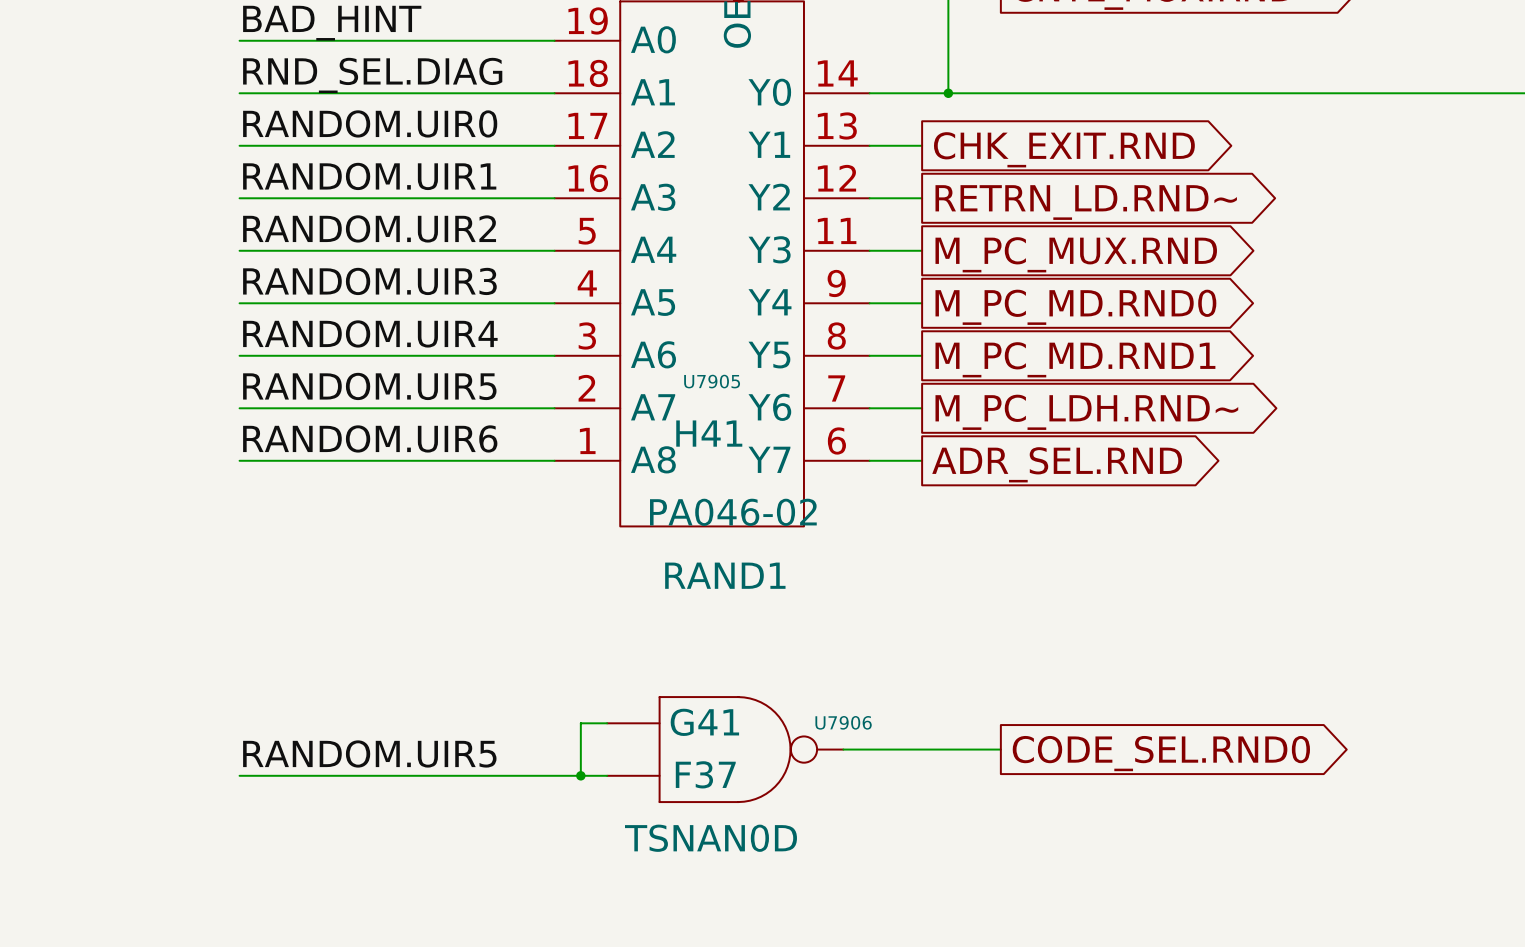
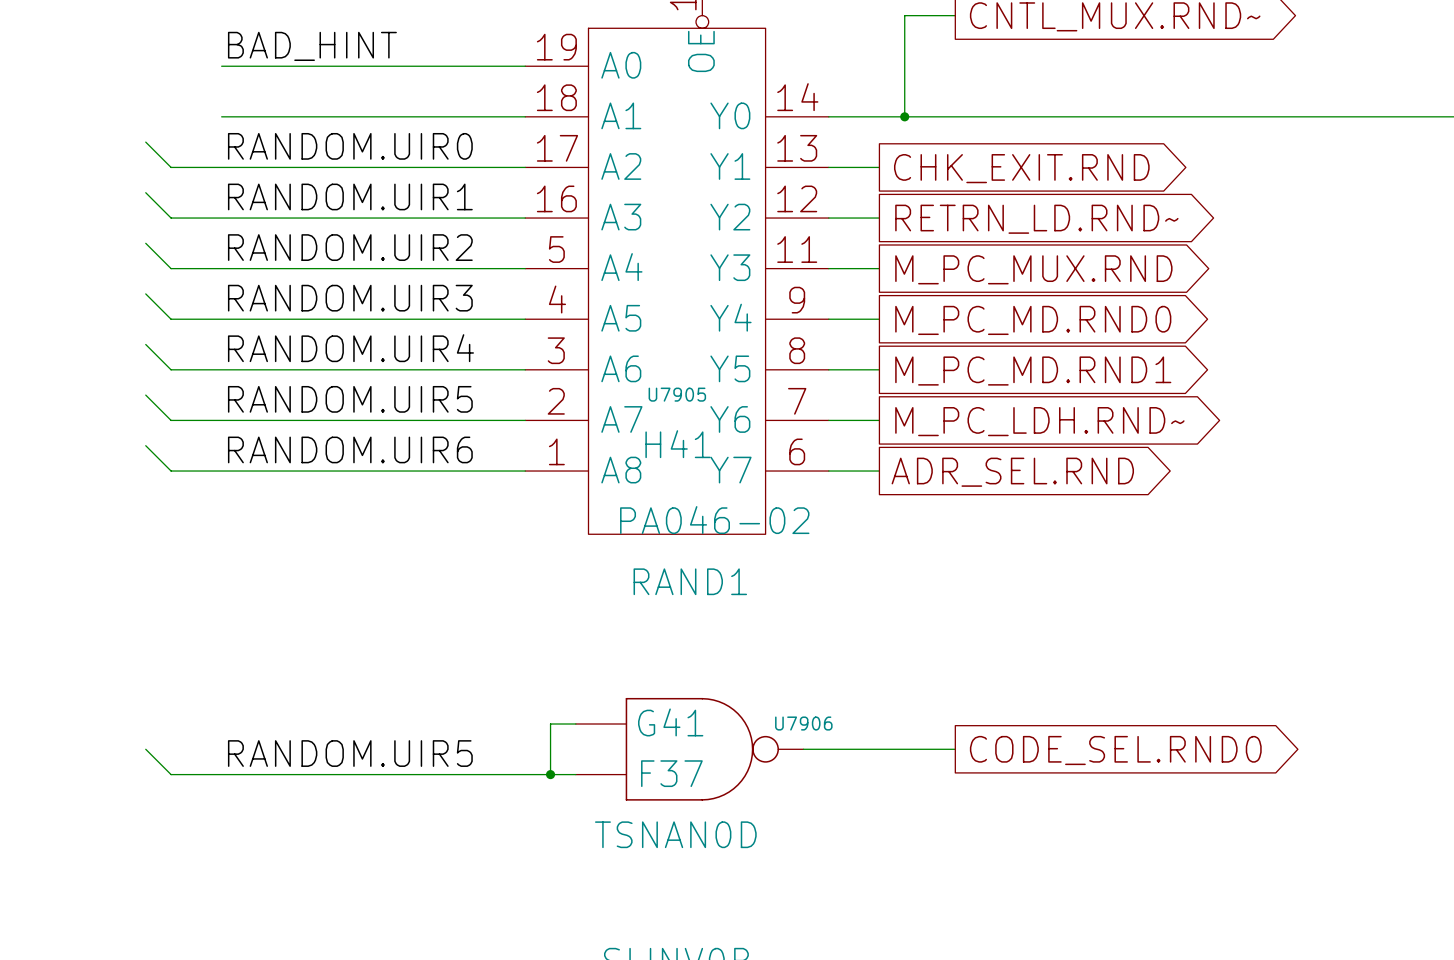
label: RND_SEL.DIAG (372, 75) -> none
wire: none -> (145, 142) (171, 167) (221, 167)
wire: none -> (145, 192) (171, 218) (221, 218)
wire: none -> (145, 243) (171, 268) (221, 268)
wire: none -> (145, 293) (171, 319) (221, 319)
wire: none -> (145, 344) (171, 369) (221, 369)
wire: none -> (145, 395) (171, 420) (221, 420)
wire: none -> (145, 445) (171, 471) (221, 471)
wire: none -> (145, 749) (171, 774) (221, 774)

